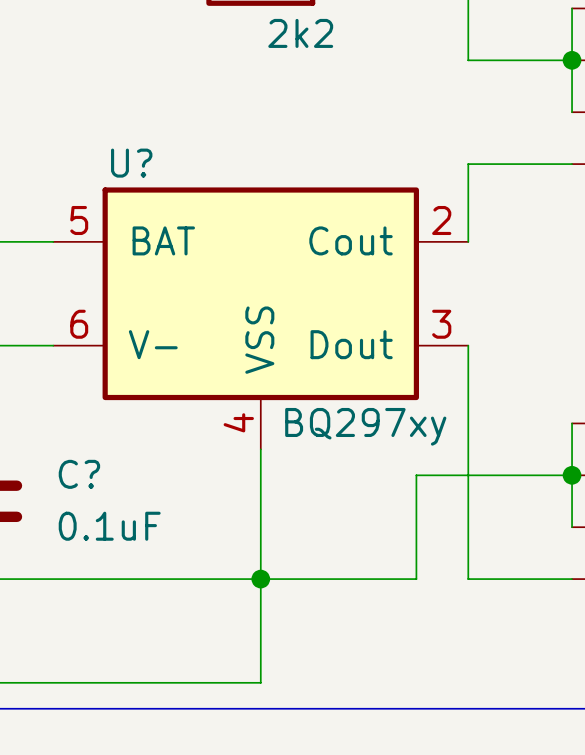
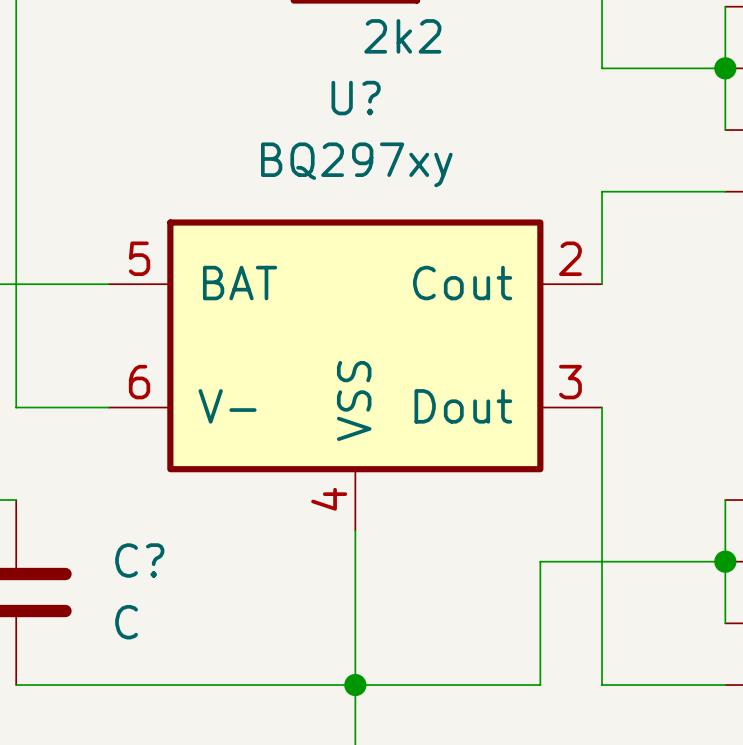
U? name position: U? (131, 163) -> U? (356, 98)
U? value position: BQ297xy (365, 426) -> BQ297xy (356, 164)
C? value: 0.1uF (109, 526) -> C (126, 622)

